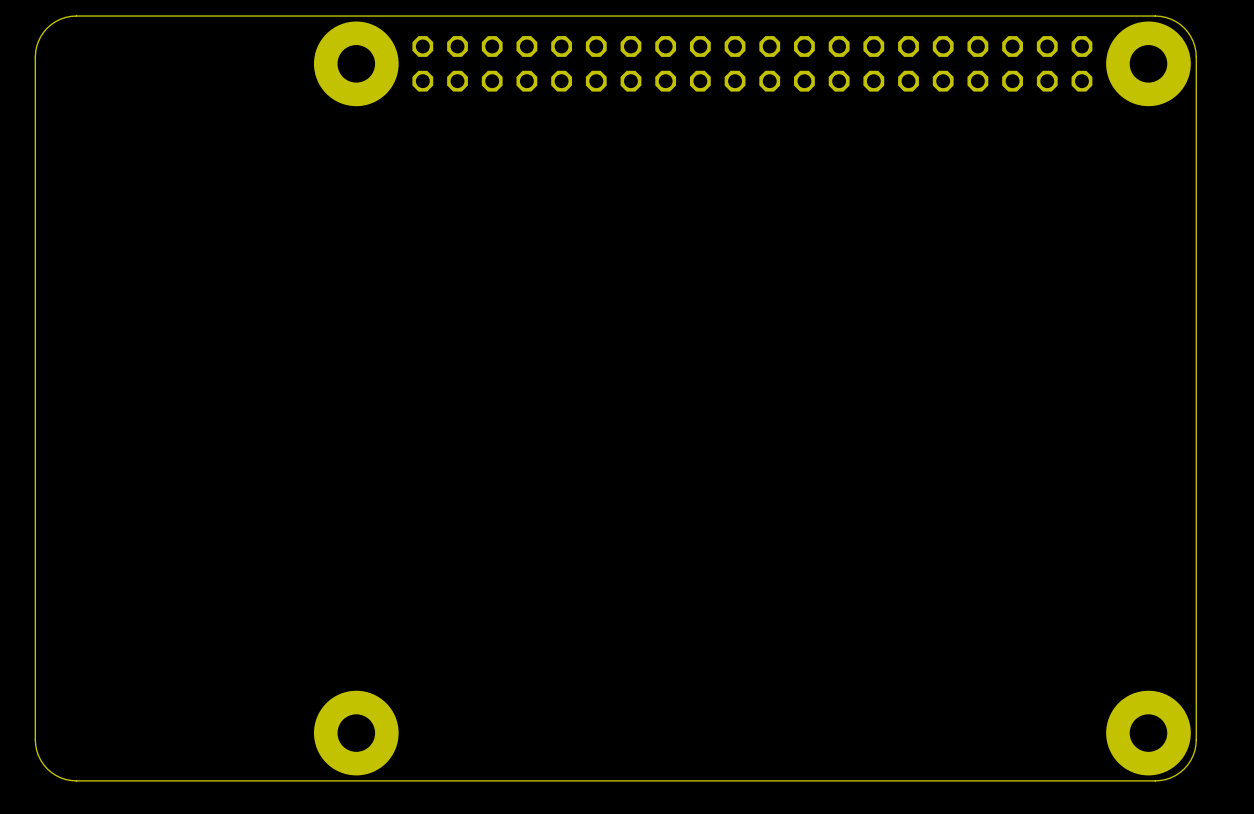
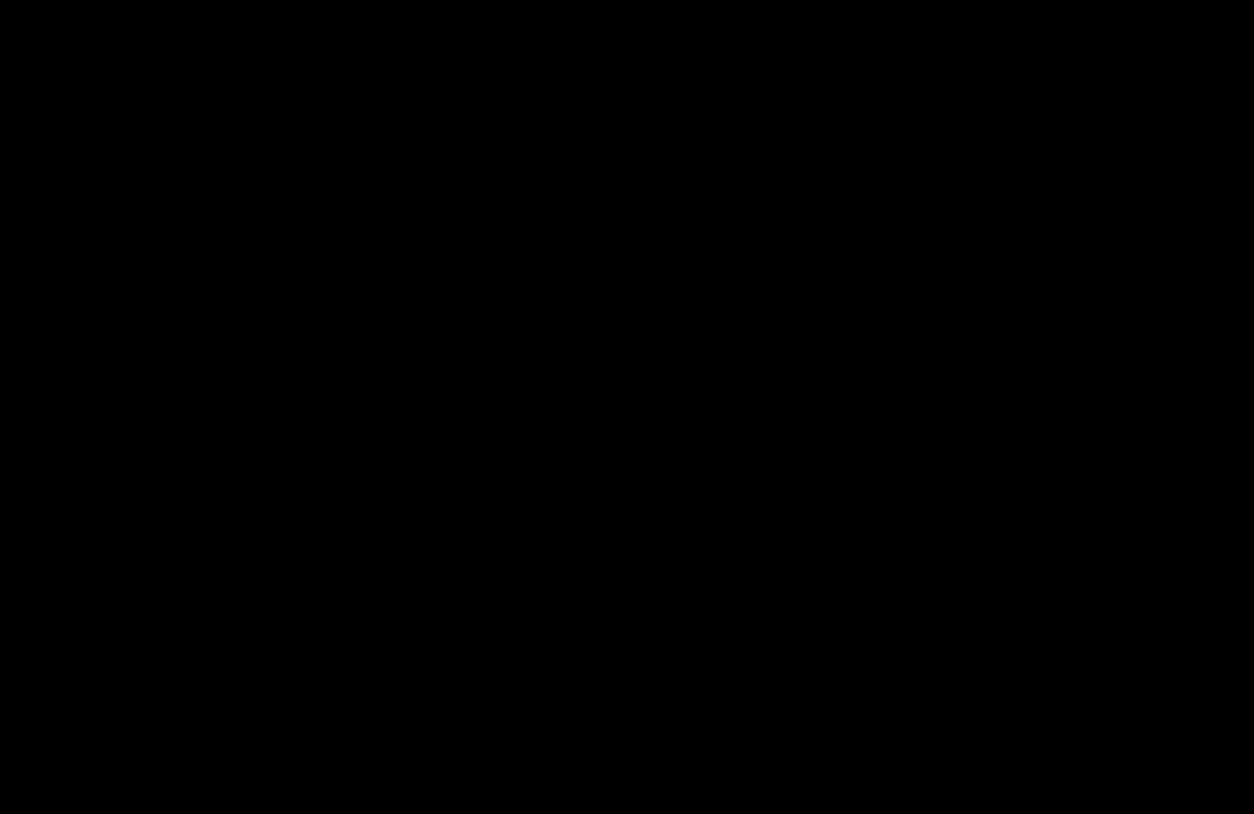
part: (615, 398) -> none

